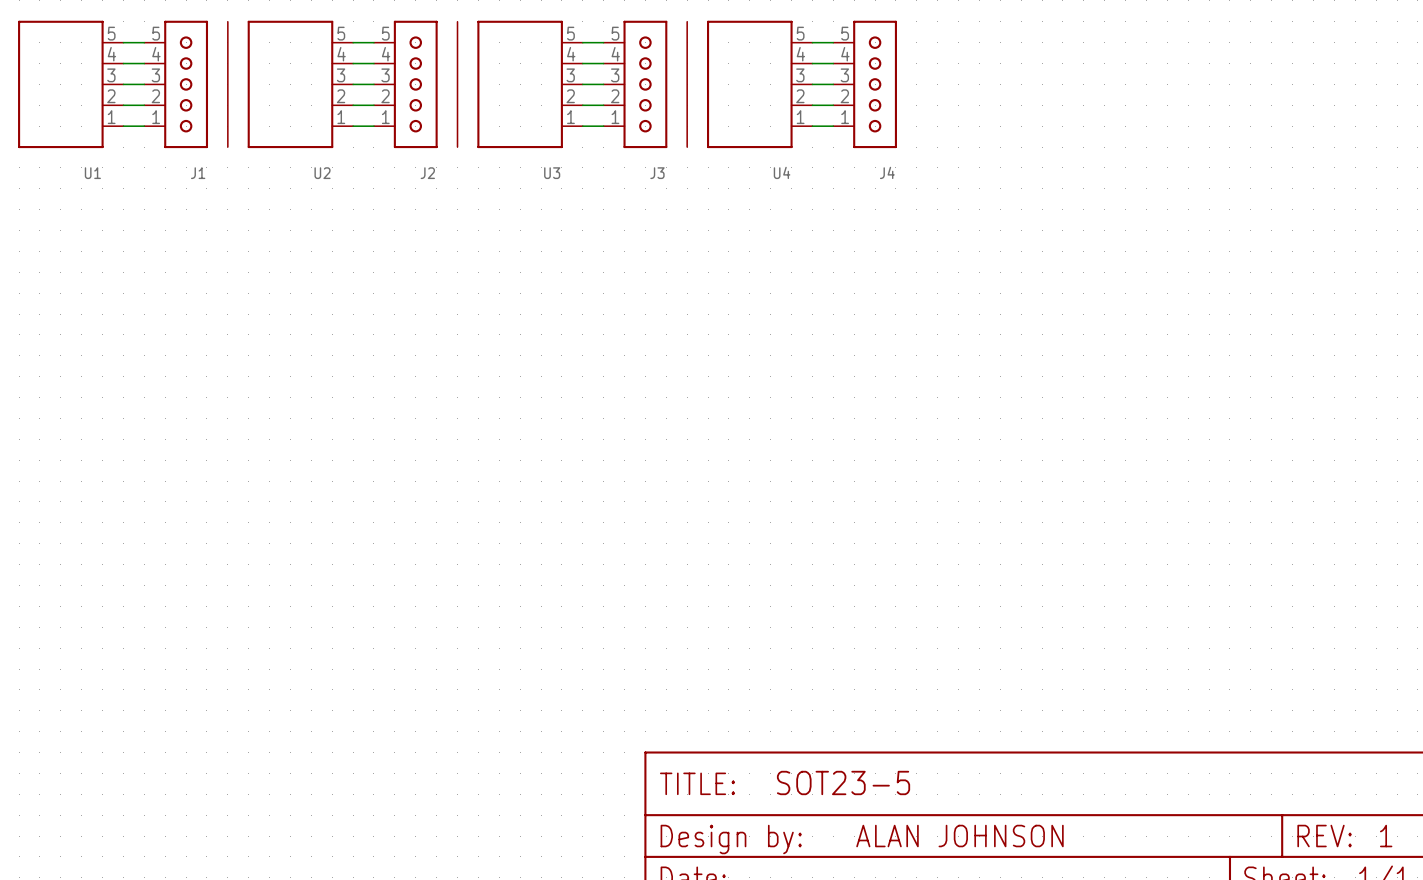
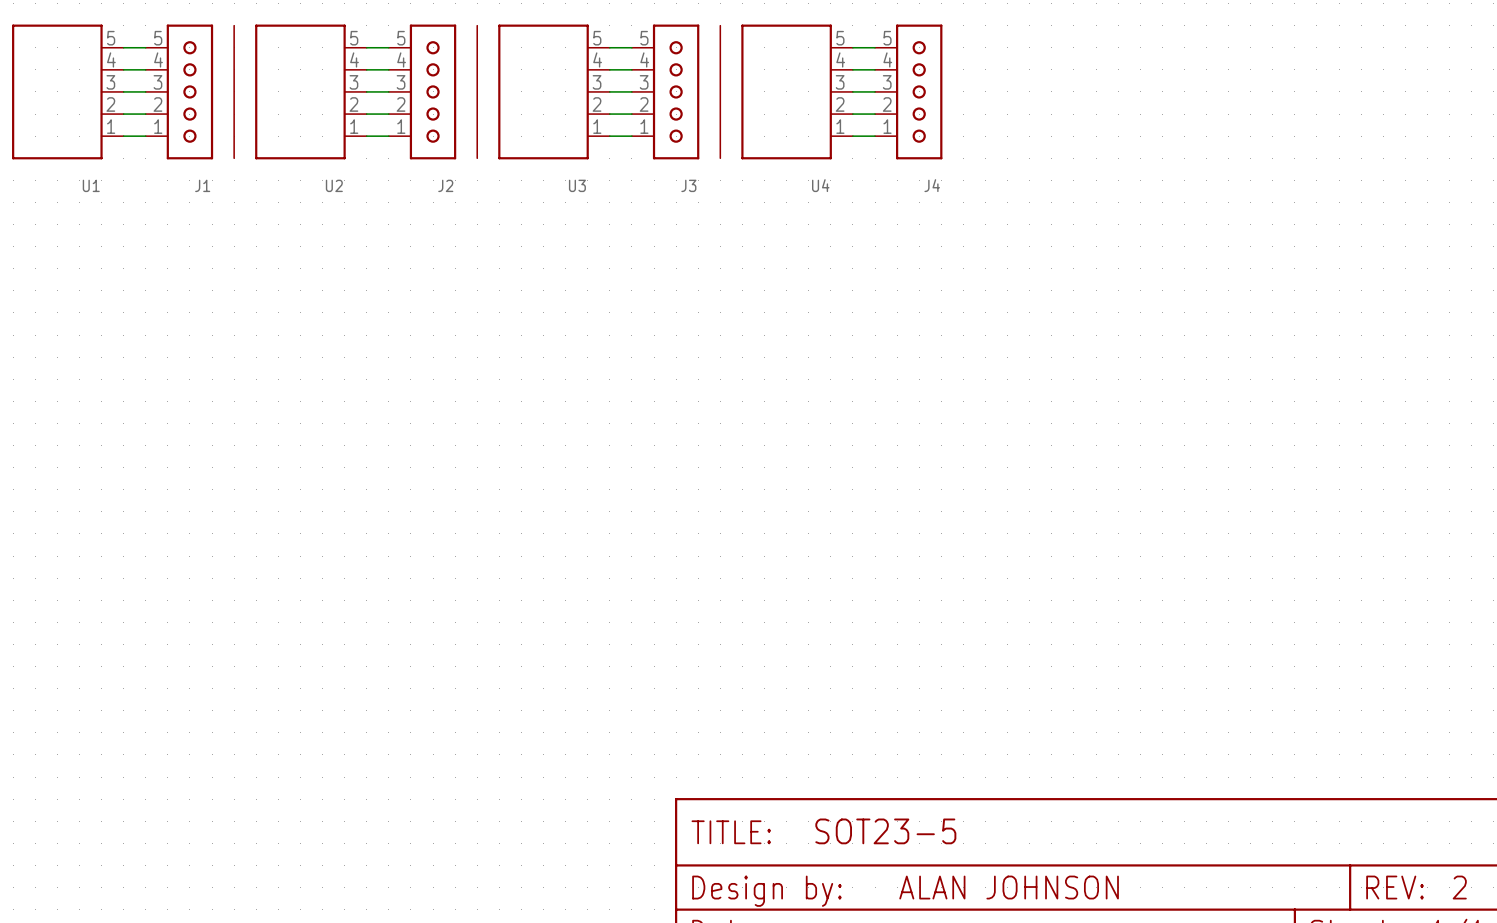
text: 1 (1386, 836) -> 2 (1459, 887)

